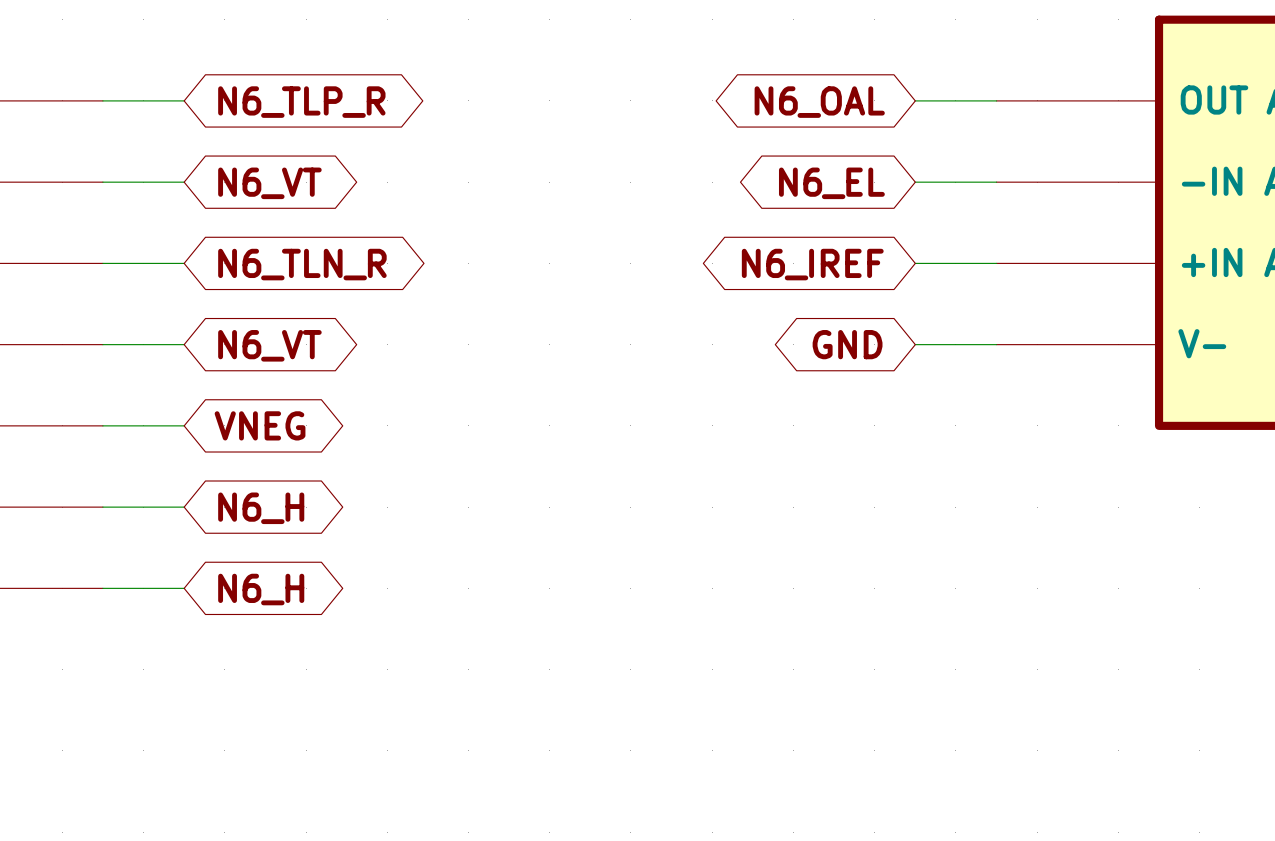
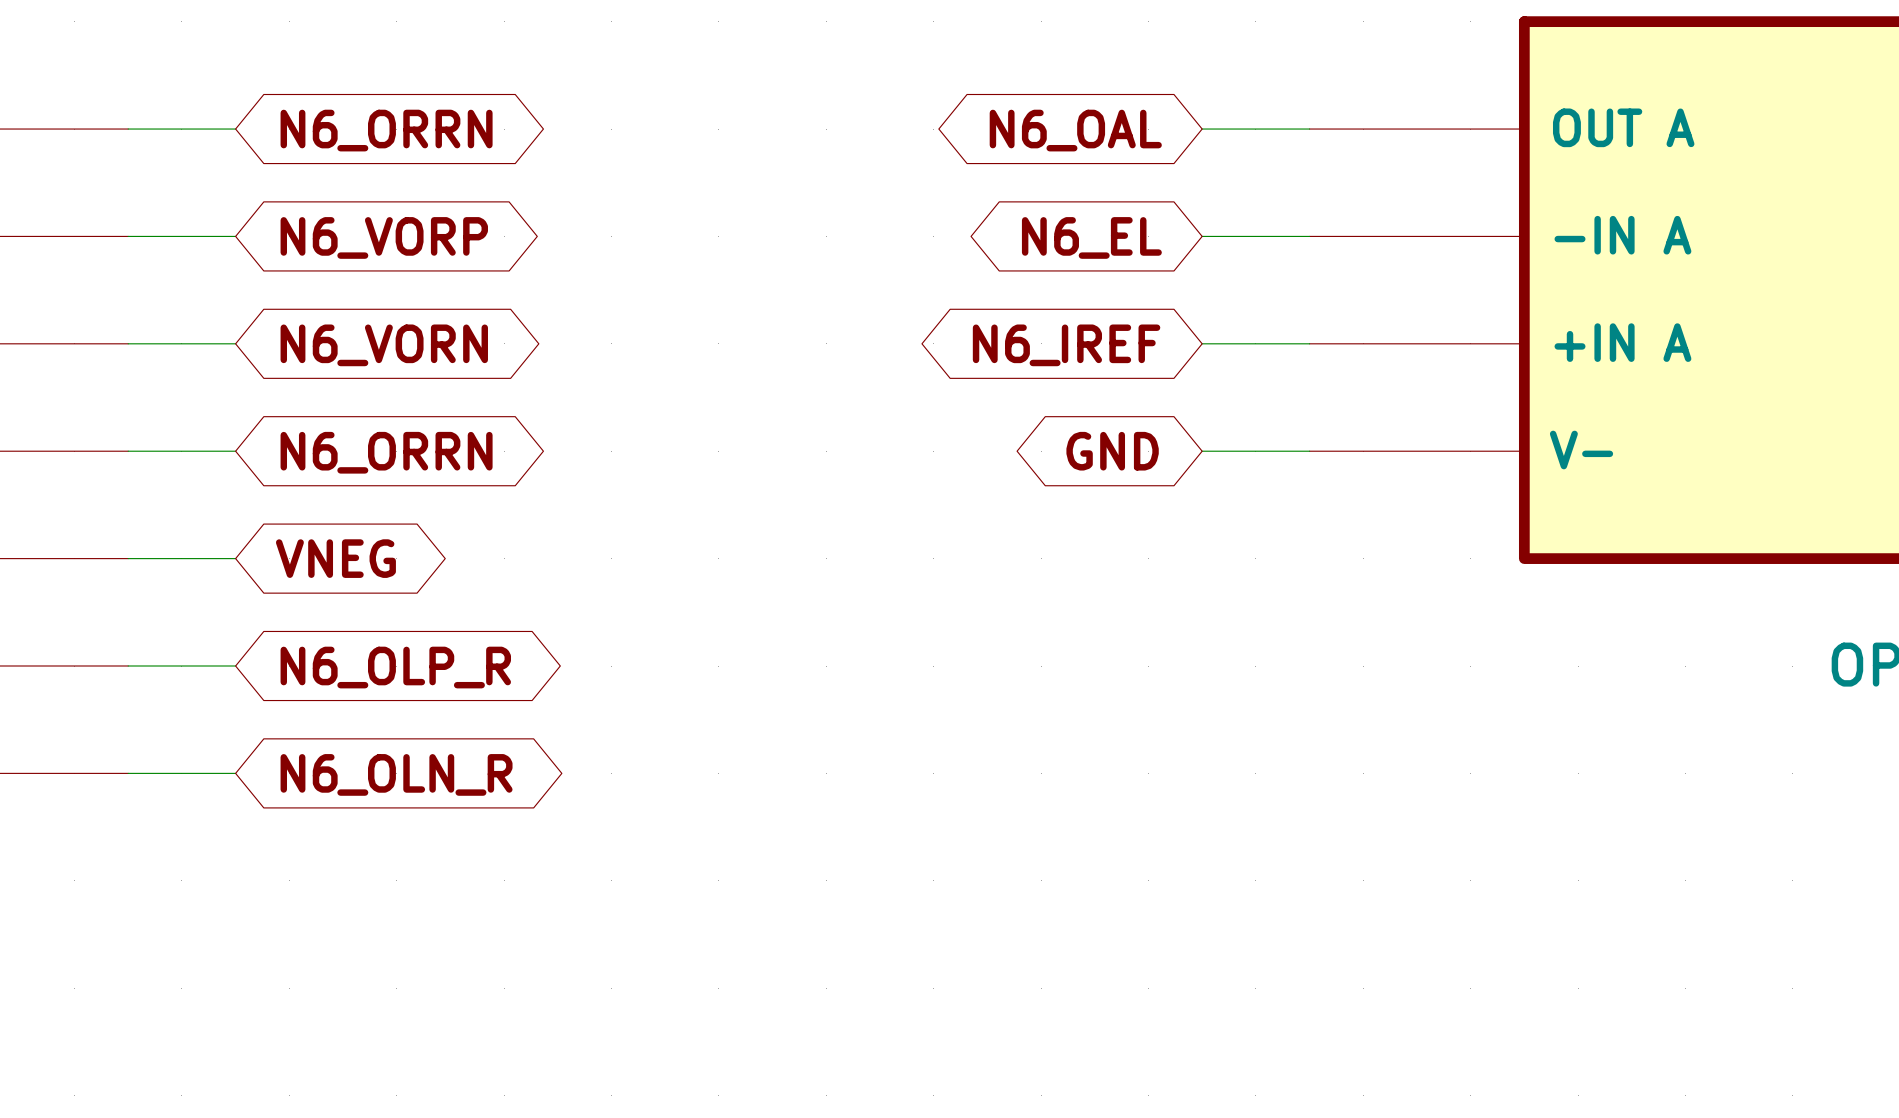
global label: N6_TLP_R (301, 102) -> N6_ORRN (386, 130)
global label: N6_VT (269, 183) -> N6_VORP (384, 237)
global label: N6_TLN_R (302, 264) -> N6_VORN (384, 345)
global label: N6_VT (269, 345) -> N6_ORRN (386, 452)
global label: N6_H (261, 508) -> N6_OLP_R (395, 667)
global label: N6_H (261, 589) -> N6_OLN_R (396, 774)

